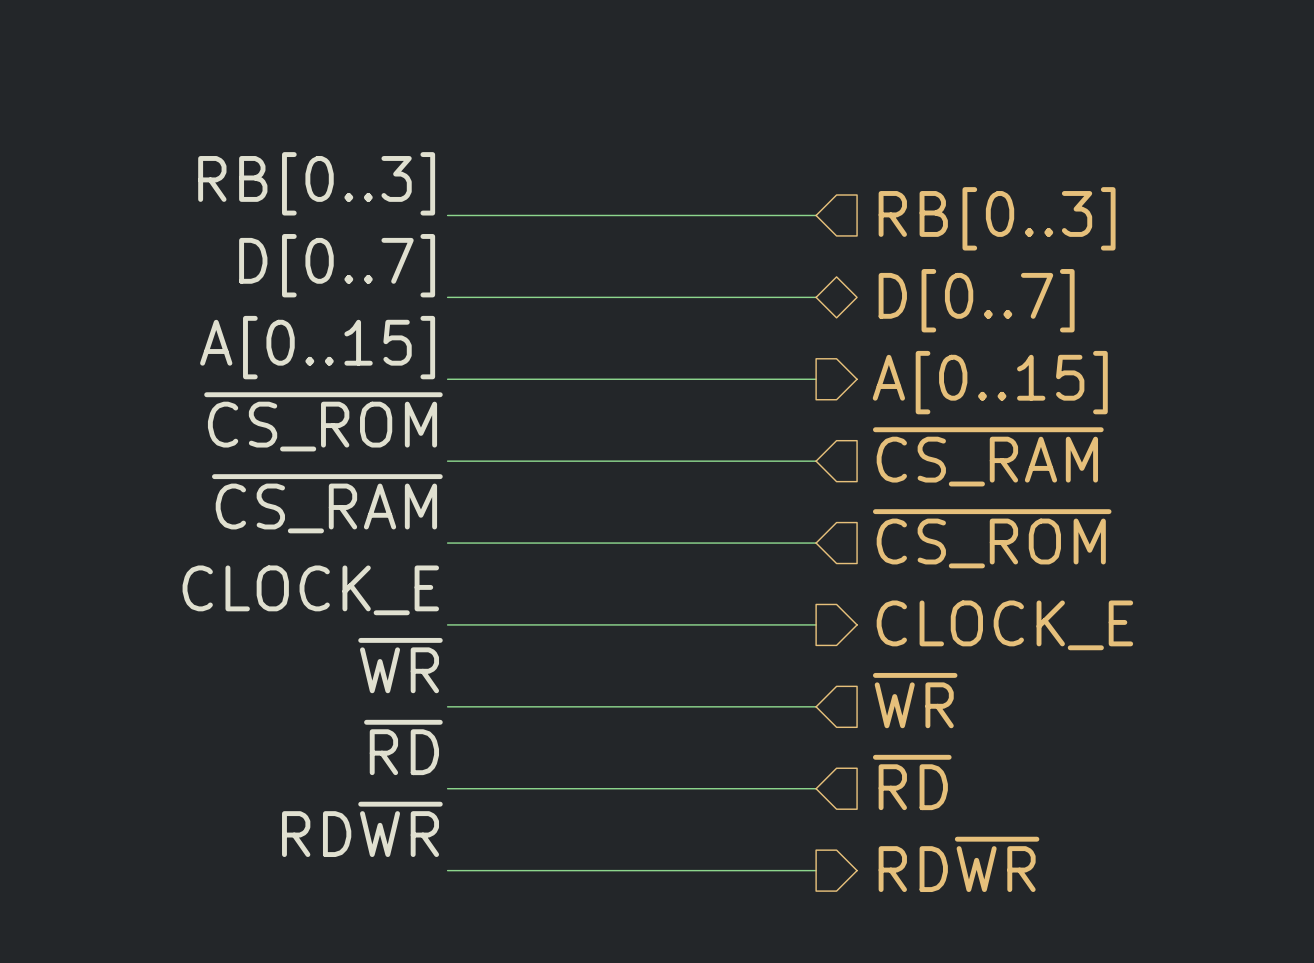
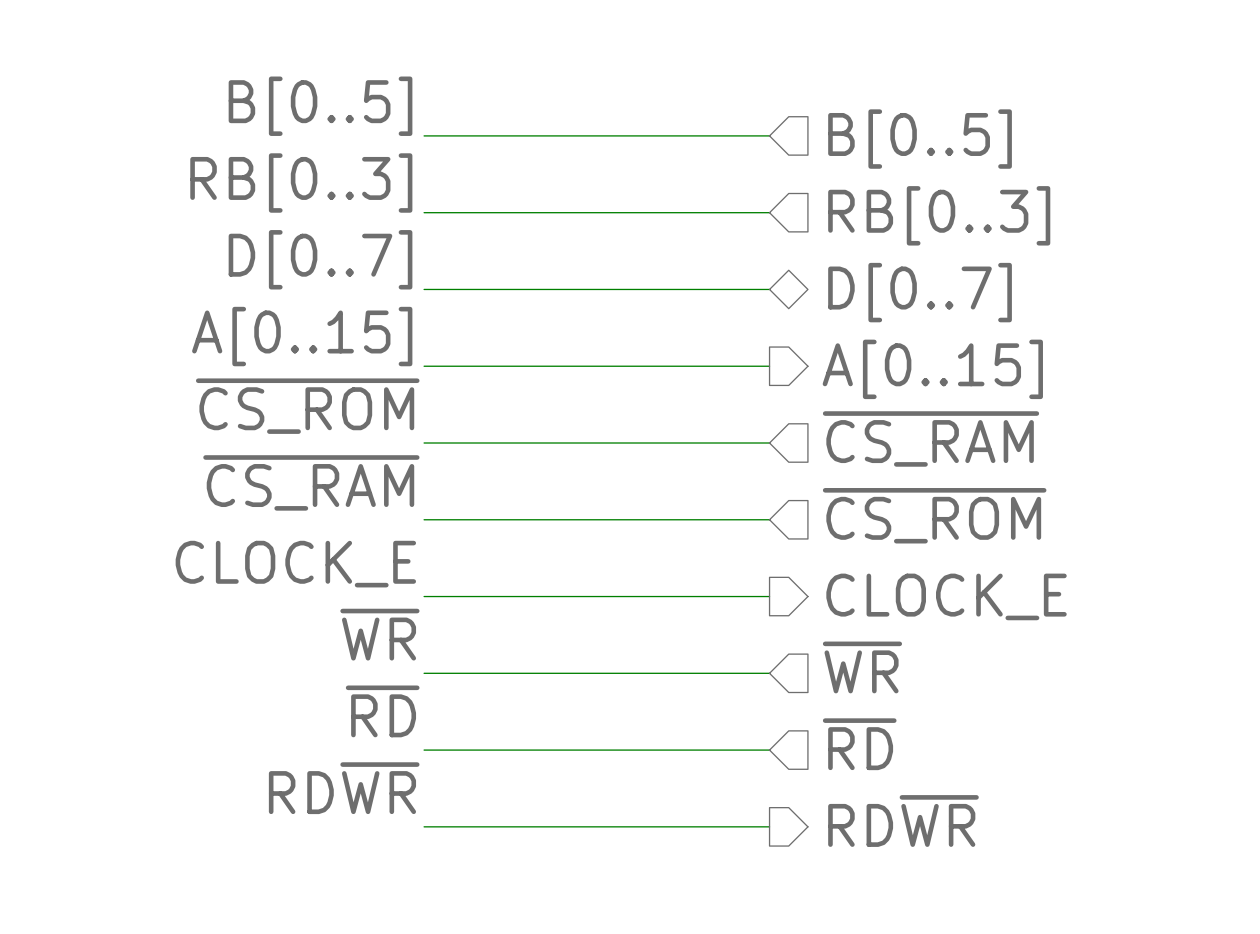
label: none -> B[0..5] (320, 106)
wire: none -> (424, 135) (769, 135)
hierarchical label: none -> B[0..5] (920, 139)

